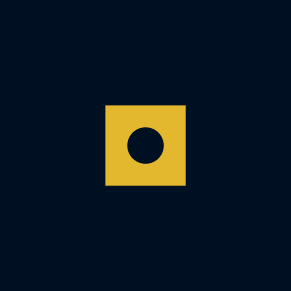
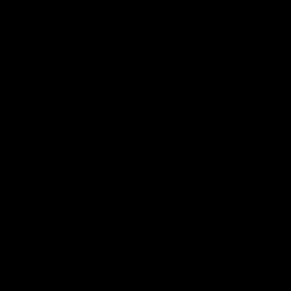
part: (145, 145) -> none

